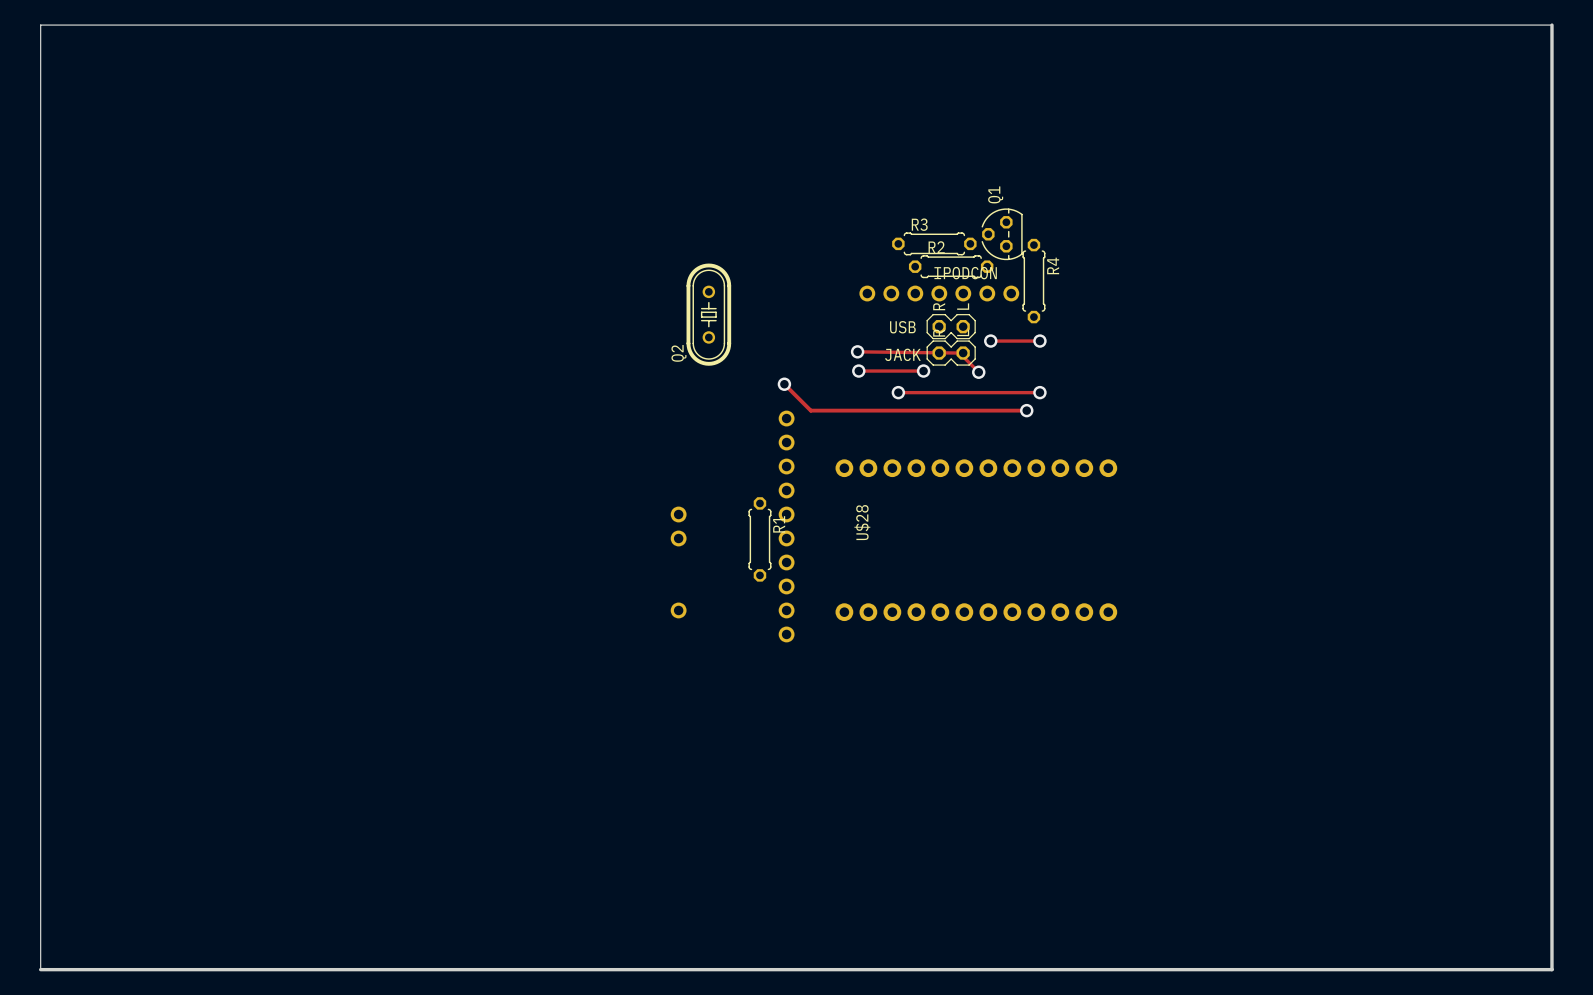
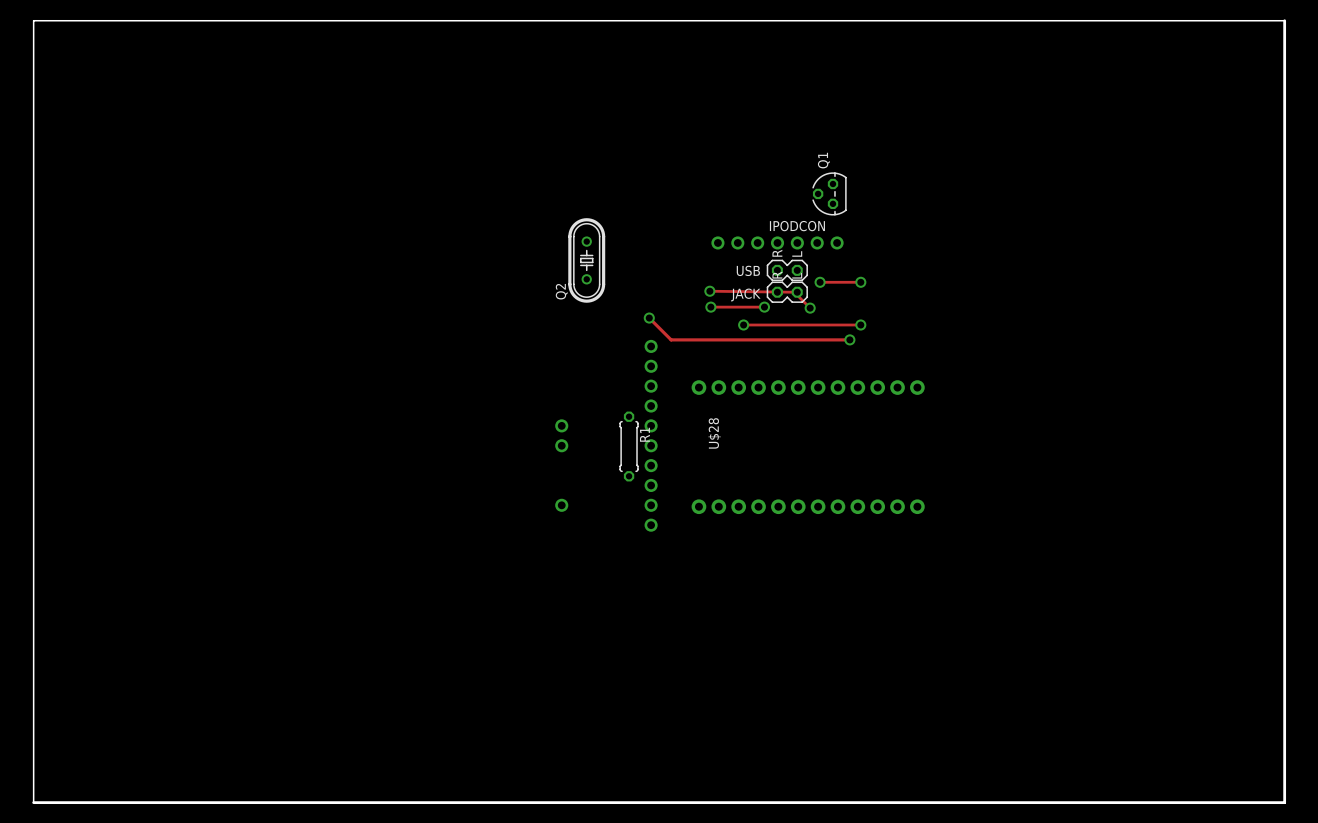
R3: (934, 243) -> none
R2: (951, 266) -> none
R4: (1033, 281) -> none

